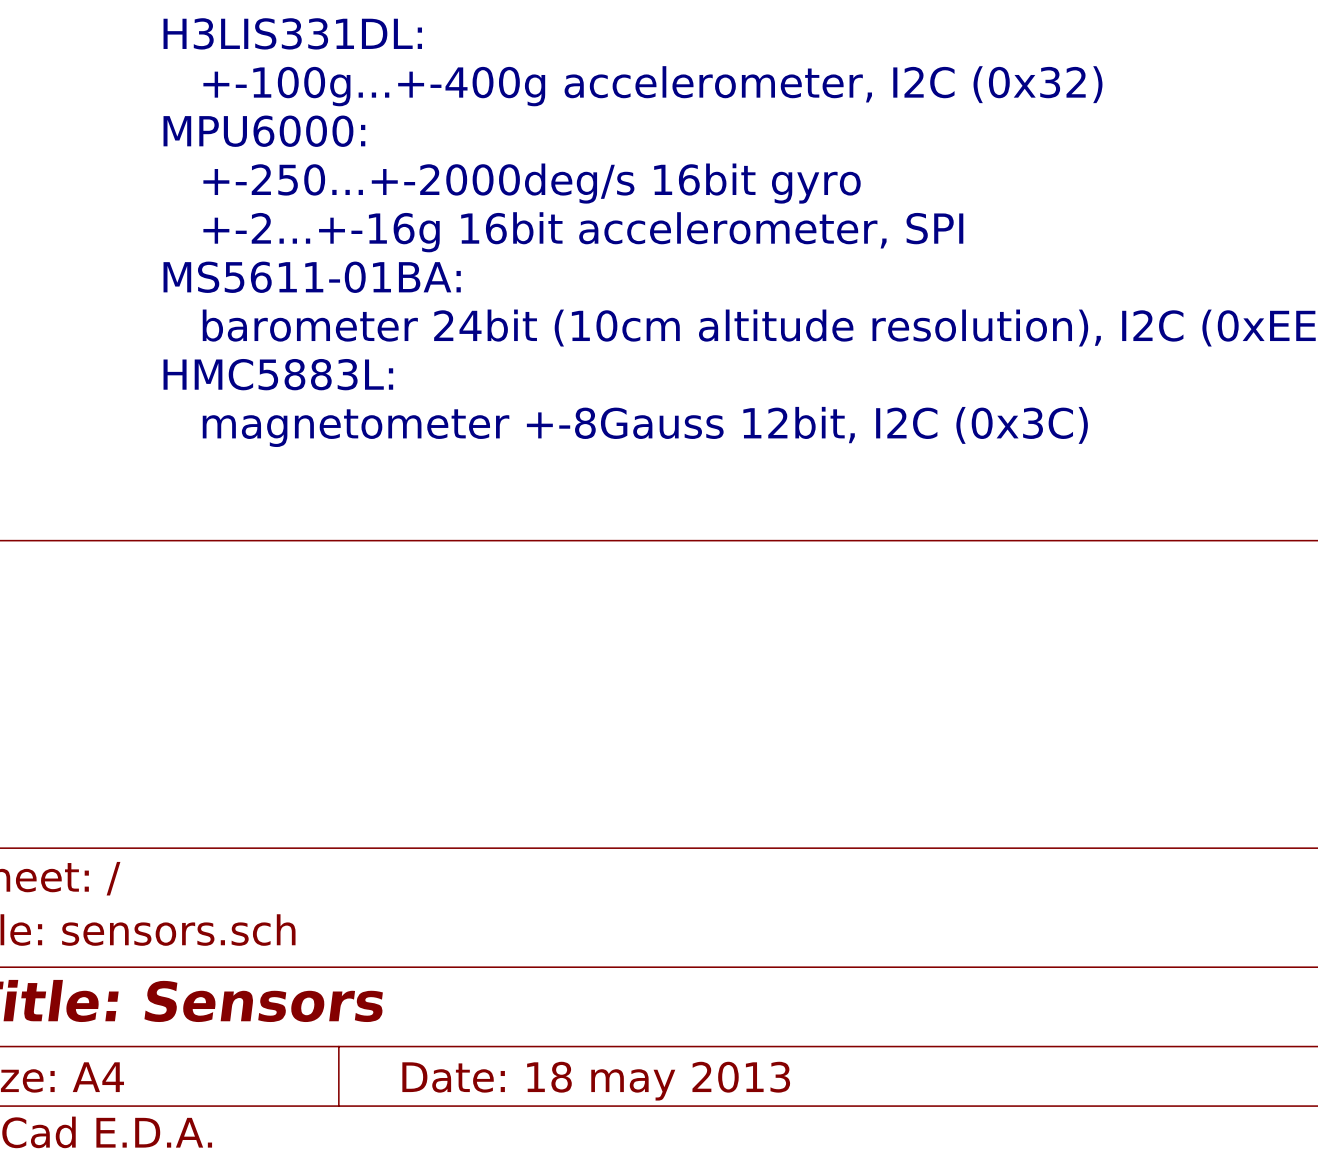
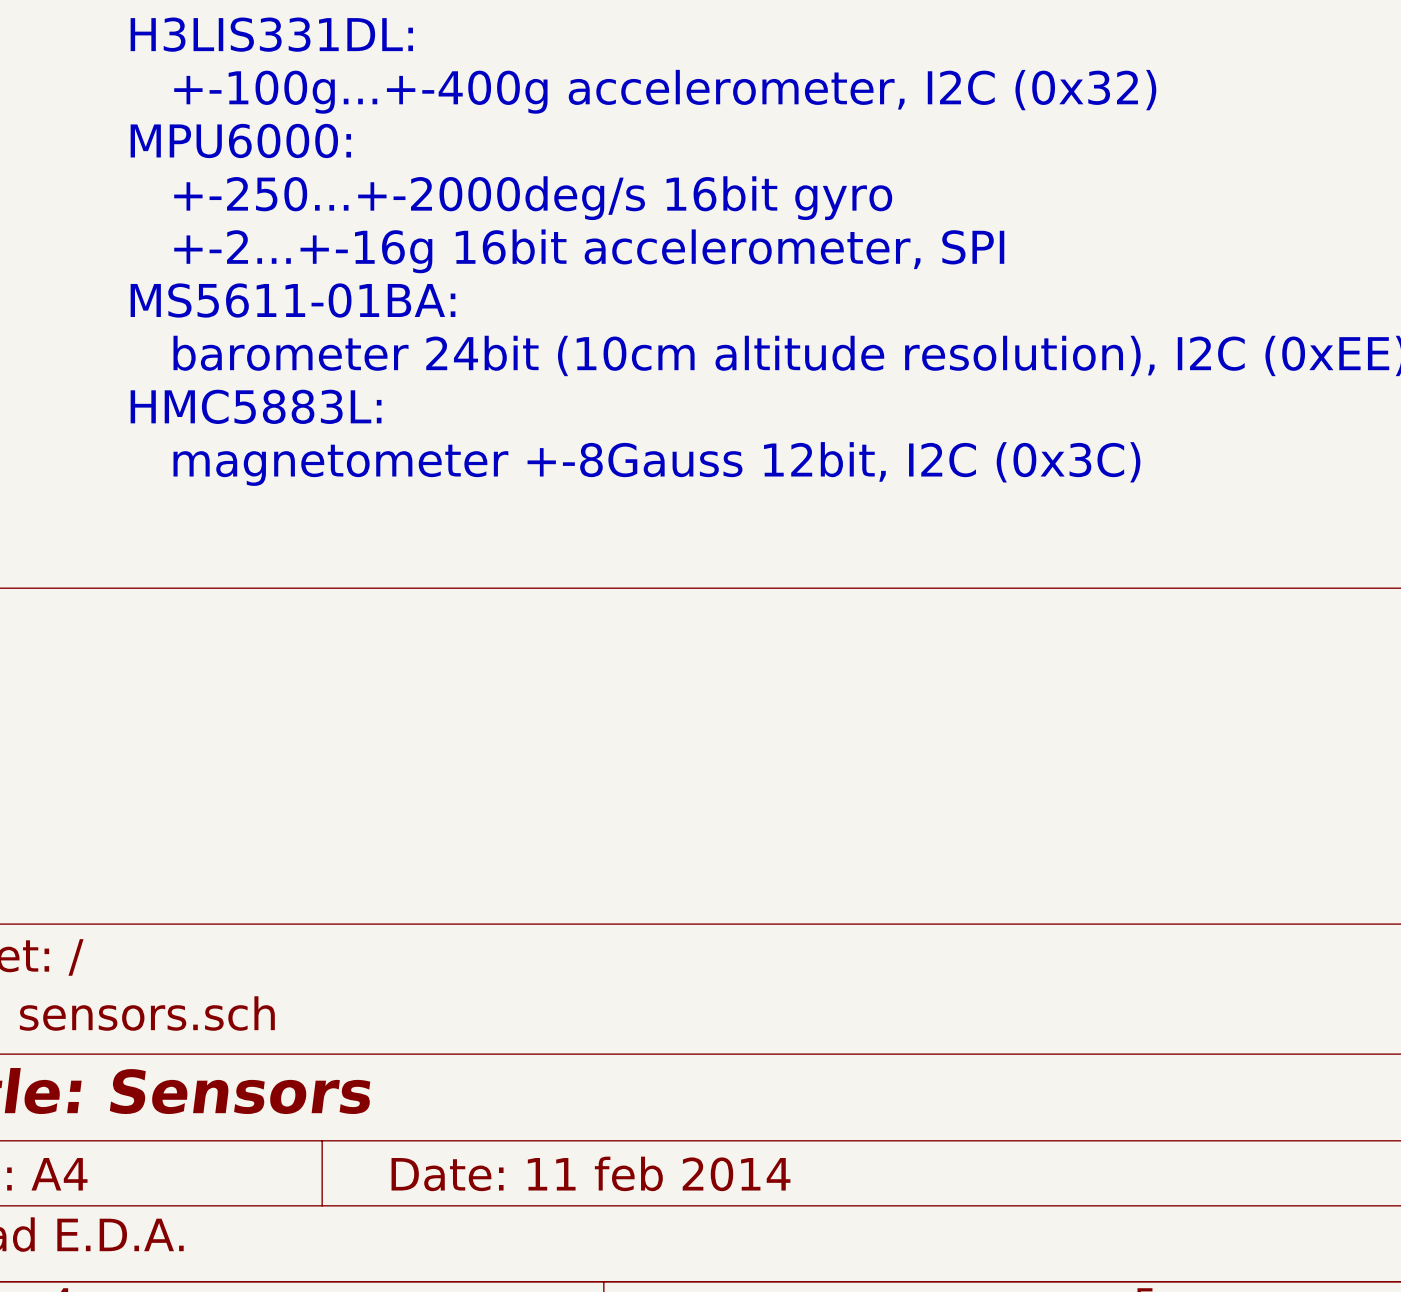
title block: Date: 18 may 2013 (596, 1081) -> Date: 11 feb 2014 (590, 1173)

